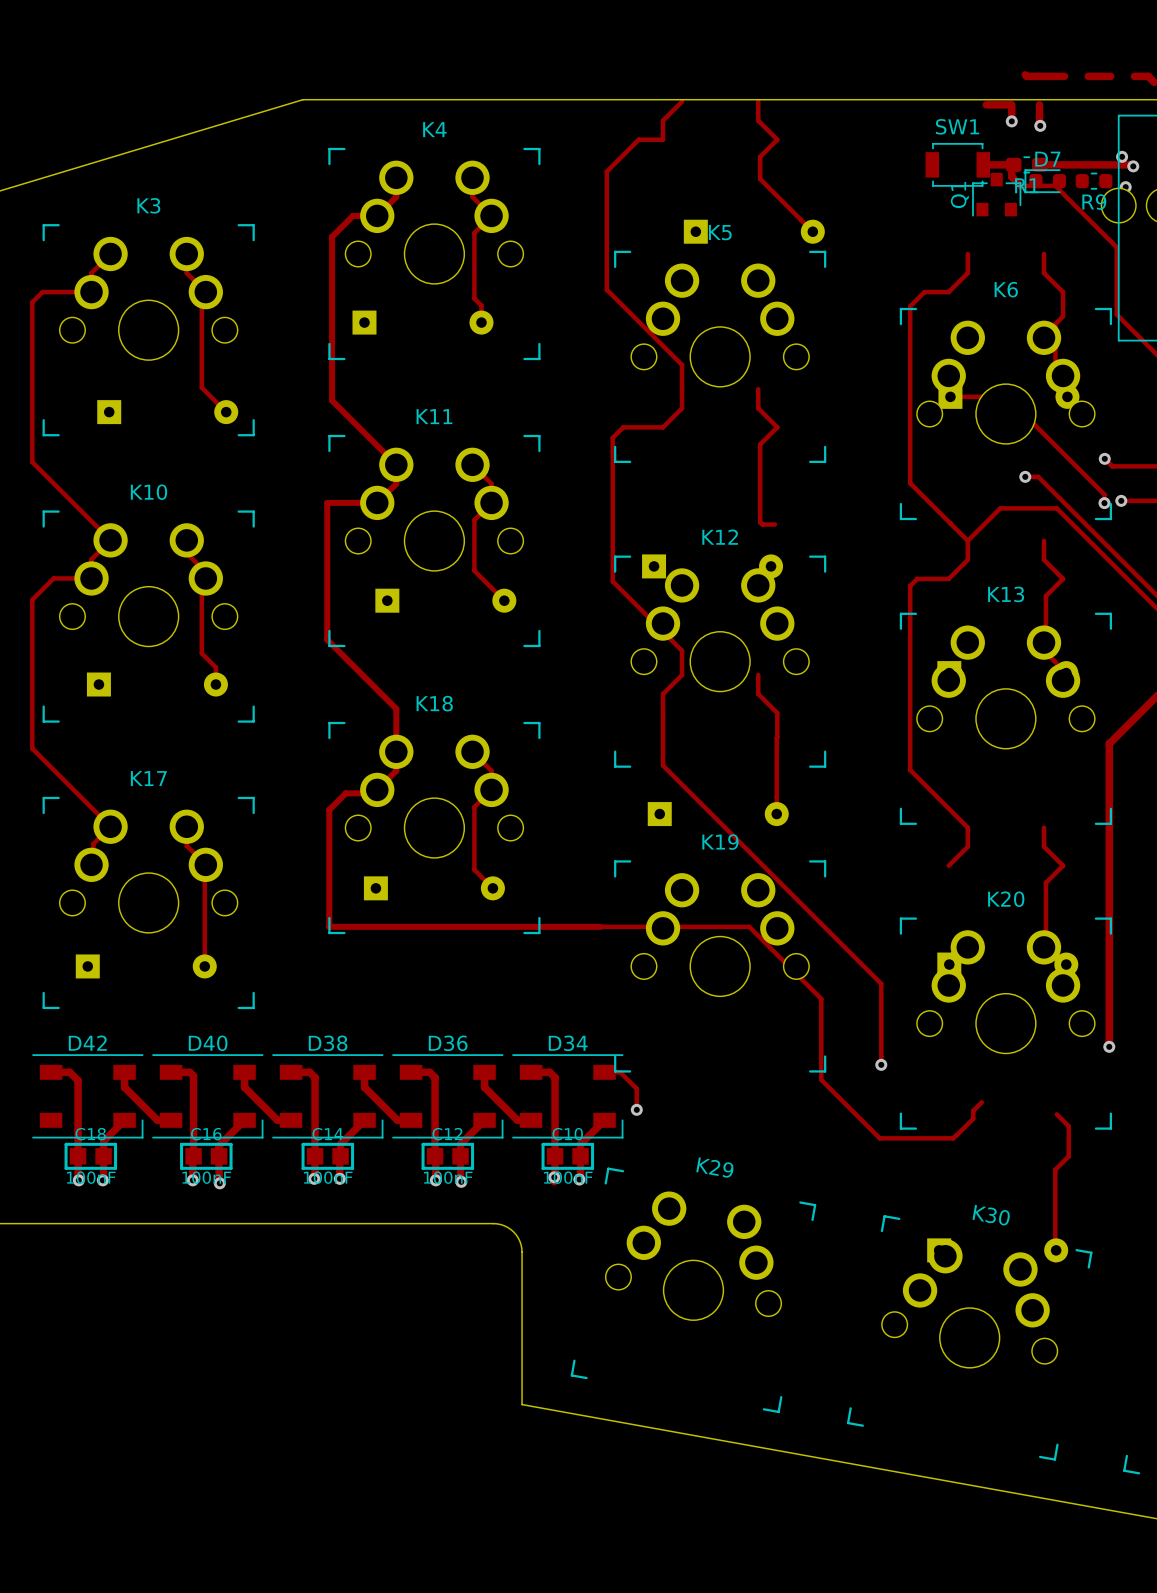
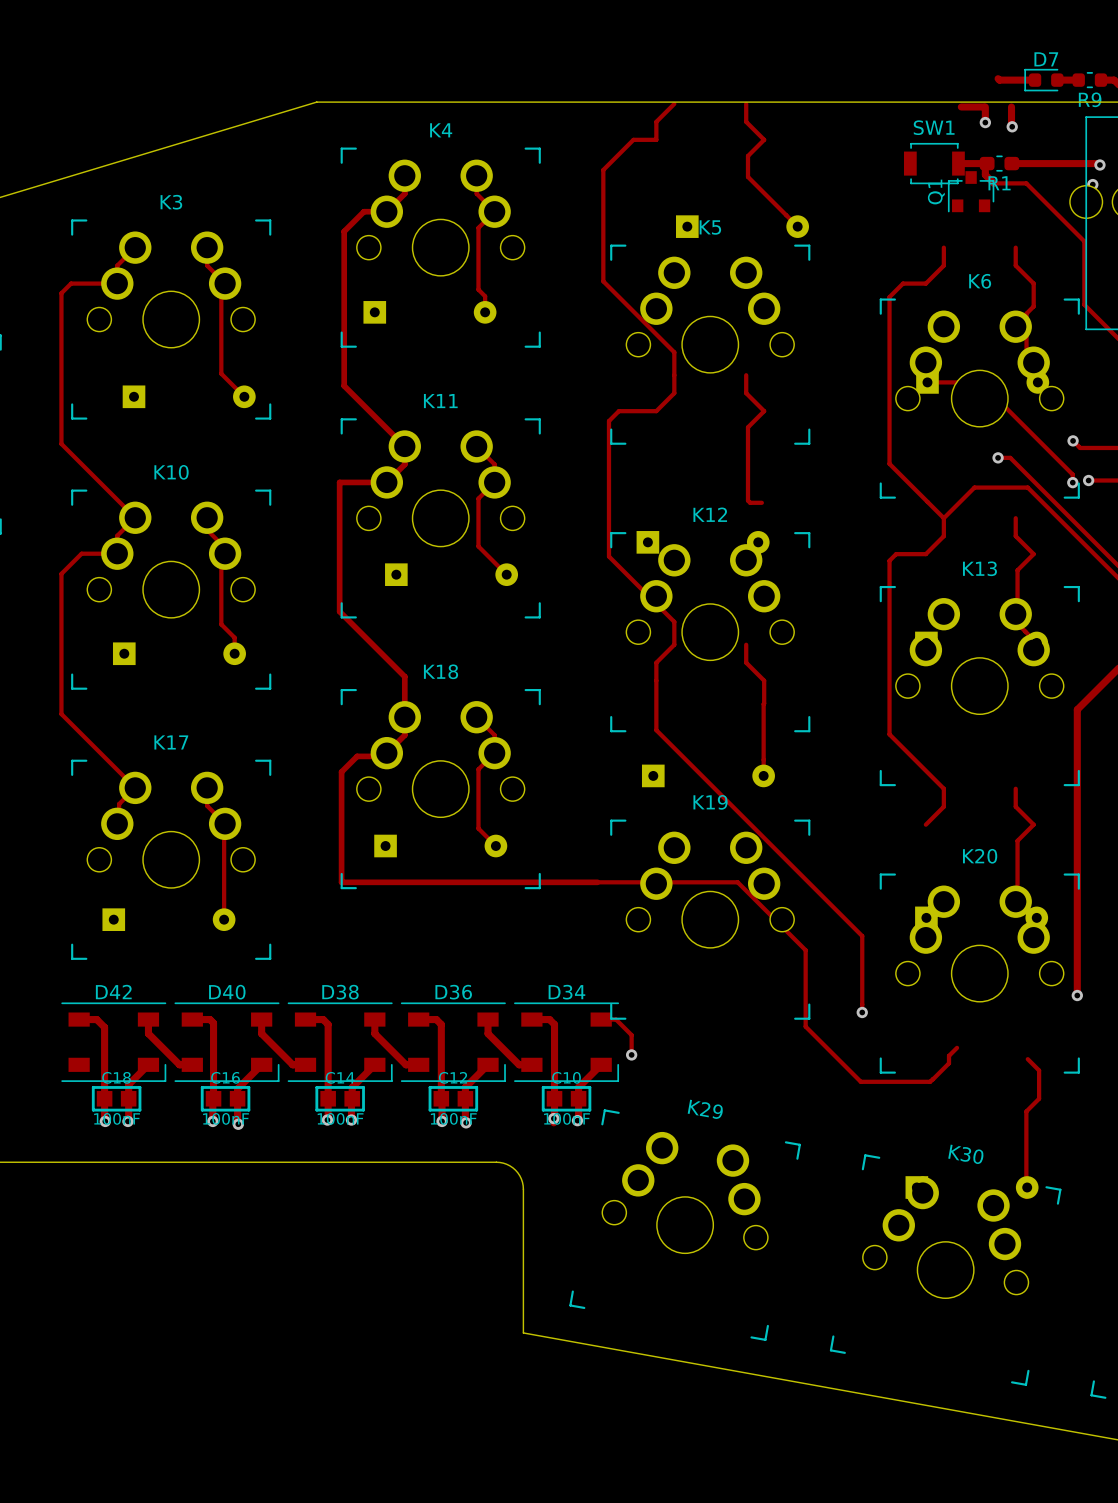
via: (1122, 156) -> none
D7 position: (1045, 181) -> (1043, 80)
R9 position: (1094, 181) -> (1089, 80)

